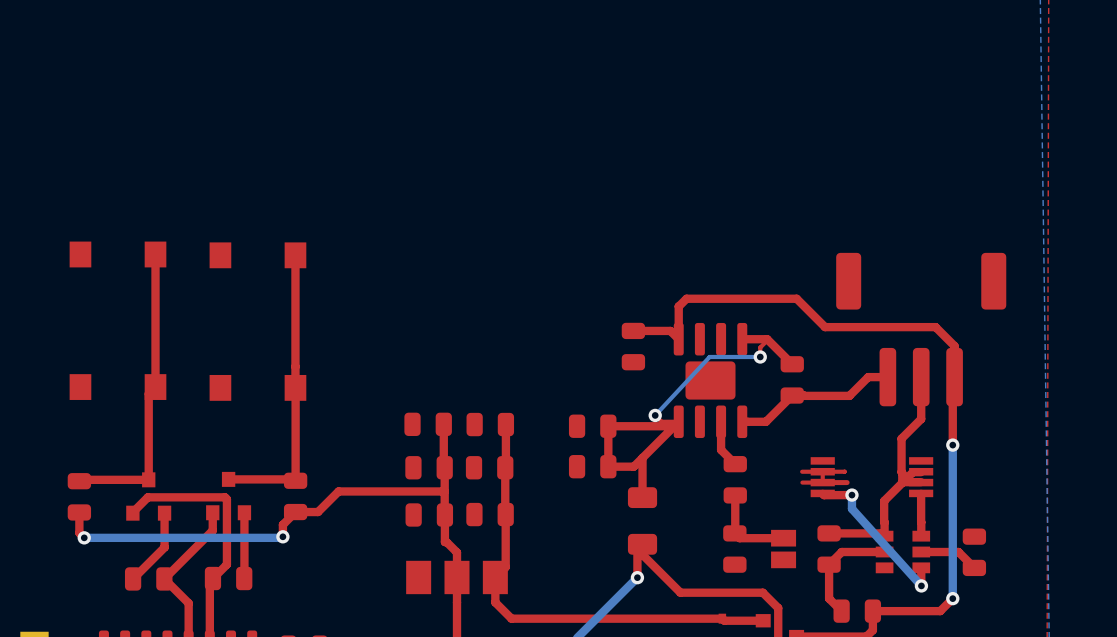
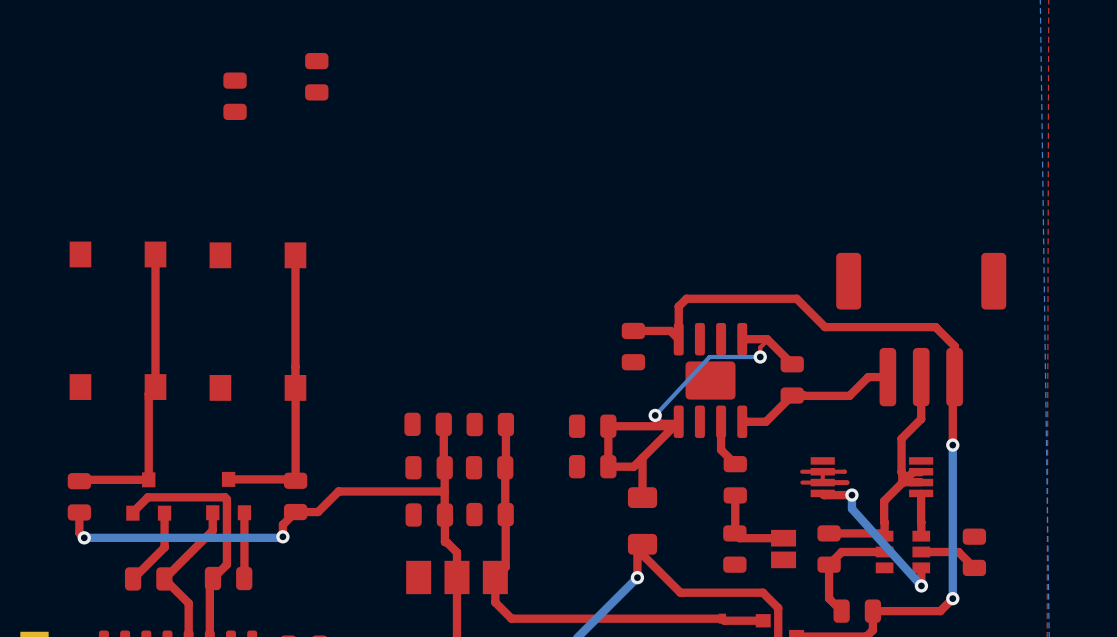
part: none -> (316, 76)
part: none -> (235, 96)

